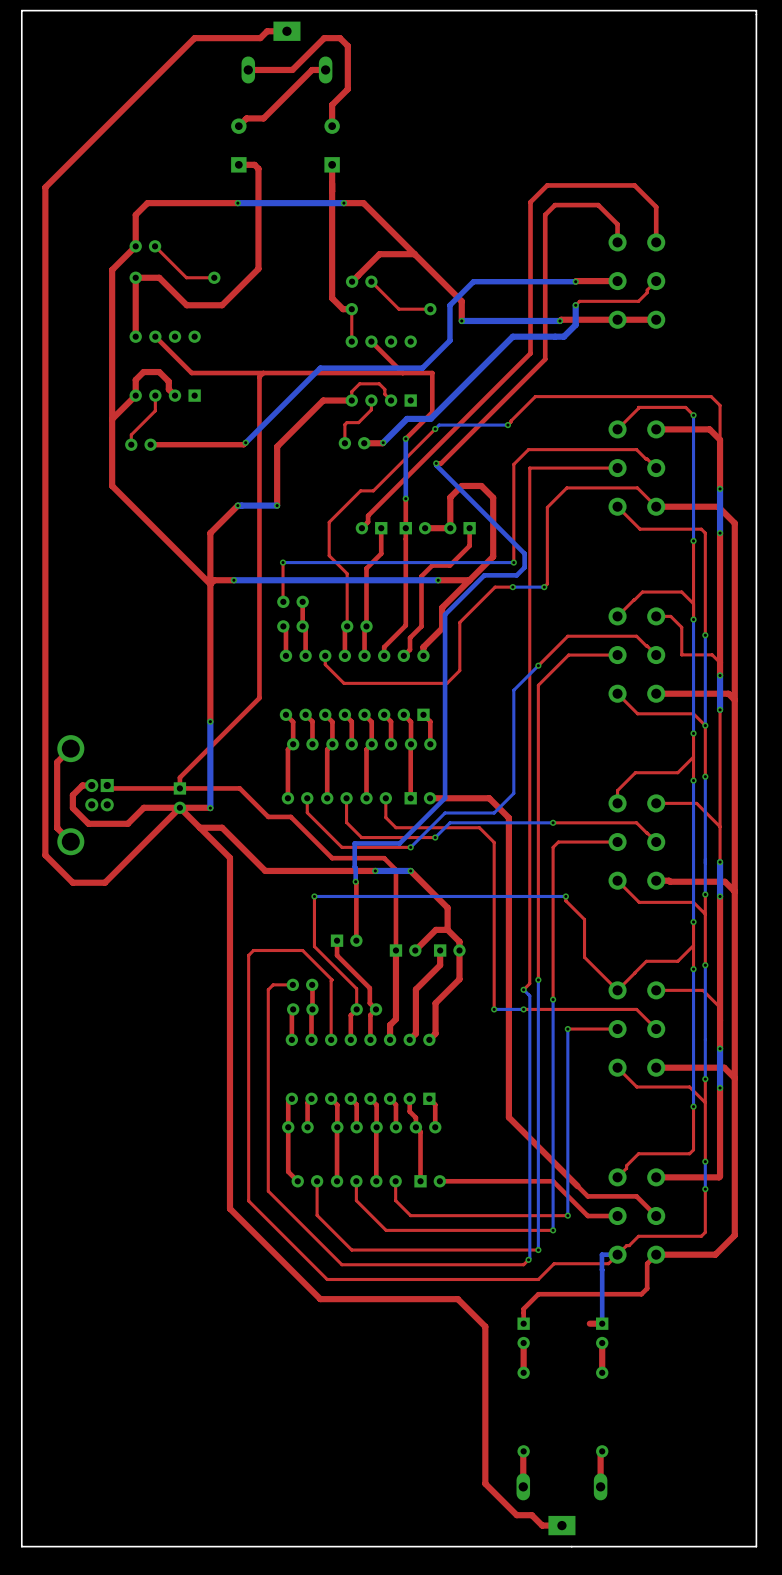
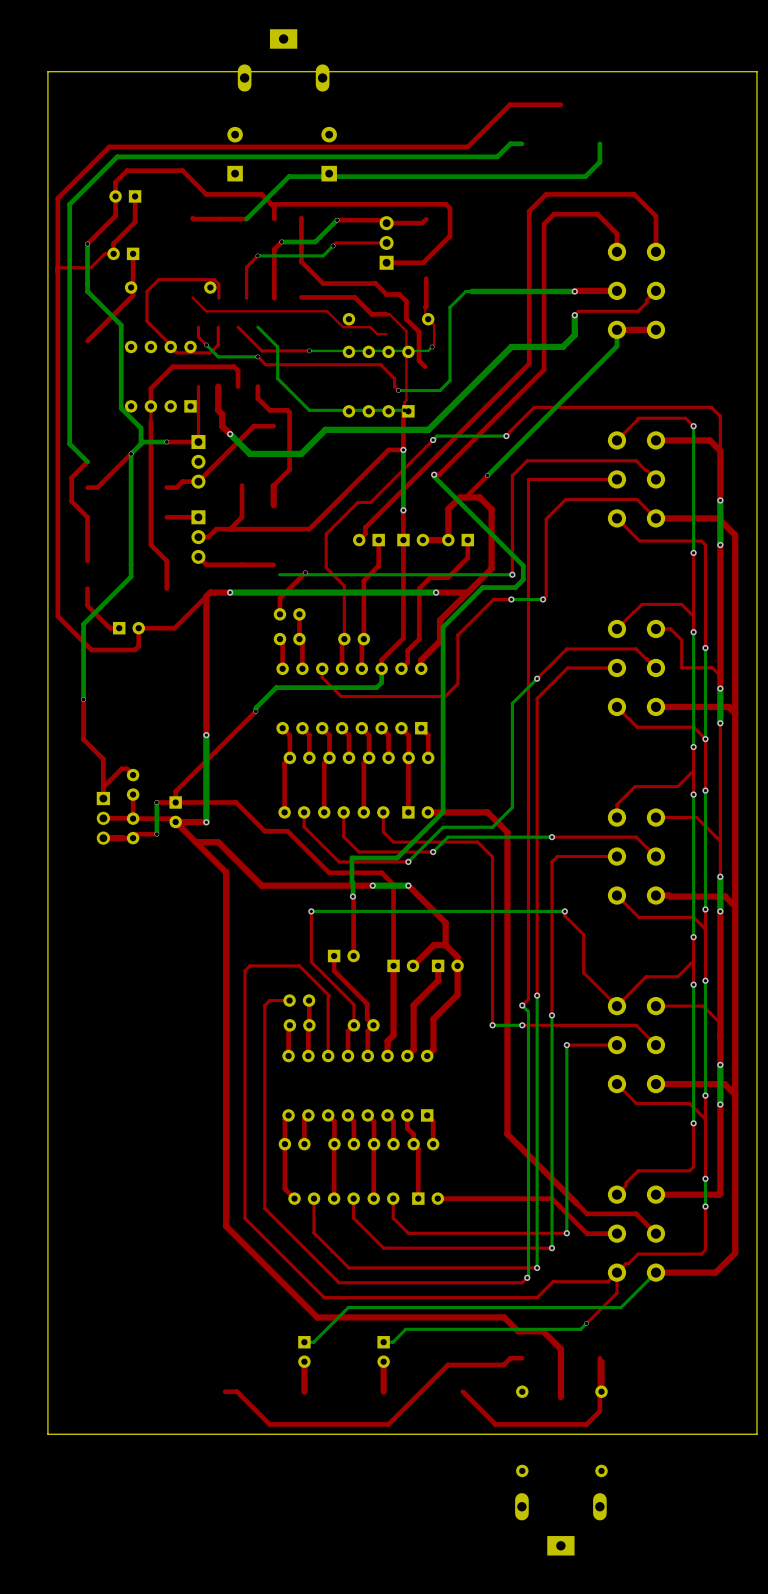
top track: (286, 31) (267, 31) (260, 38) (194, 38) (45, 187) (45, 855) (72, 882) (104, 882) (179, 807) (143, 807) (127, 823) -> (156, 834) (137, 834) (133, 838) (123, 838)
board edge: (756, 63) (756, 10) (21, 10) (21, 1546) (756, 1546) (756, 1415) -> (756, 71) (47, 71) (47, 1434) (756, 1434)
top track: (248, 69) (292, 69) (324, 38) (339, 38) (347, 45) (347, 89) (332, 104) (332, 126) -> none
top track: (325, 69) (312, 69) (263, 118) (246, 118) (238, 126) -> none
top track: none -> (560, 104) (509, 104) (467, 146) (109, 146) (57, 198) (57, 616) (91, 649) (135, 649) (138, 646) (138, 628) (174, 628) (206, 596)
bottom track: none -> (521, 143) (510, 143) (497, 156) (117, 156) (69, 204) (69, 444) (87, 461)
bottom track: none -> (599, 143) (599, 162) (585, 176) (289, 176) (246, 219)
top track: (238, 164) (254, 164) (258, 168) (258, 268) (222, 305) (186, 305) (159, 277) (135, 277) (135, 336) -> none
top track: (332, 164) (332, 298) (343, 309) (351, 309) (351, 341) -> none
part: none -> (125, 196)
top track: none -> (135, 196) (135, 222) (113, 243) (113, 253) (104, 253) (90, 267) (57, 267)
top track: none -> (271, 204) (446, 204) (449, 208) (449, 236) (423, 262) (386, 262)
top track: (237, 203) (147, 203) (135, 214) (135, 246) (112, 269) (112, 485) (210, 584) (210, 533) (237, 505) -> none
via: (237, 203) -> none
top track: (343, 203) (363, 203) (461, 301) (461, 320) -> none
bottom track: (343, 203) (237, 203) -> none
via: (343, 203) -> none
top track: none -> (192, 218) (246, 219)
top track: none -> (274, 219) (274, 206) (261, 194) (206, 194) (182, 170) (127, 170) (115, 182) (115, 215) (87, 243)
top track: none -> (301, 218) (301, 261) (323, 283) (375, 283) (386, 294) (399, 294) (406, 301) (406, 319) (418, 331) (418, 360) (425, 366)
bottom track: none -> (337, 220) (315, 241) (281, 241)
via: none -> (337, 220)
top track: none -> (426, 219) (422, 223) (386, 223) (383, 220) (337, 220)
top track: none -> (281, 241) (274, 249) (274, 298)
via: none -> (281, 241)
top track: none -> (386, 242) (336, 242) (333, 245)
part: none -> (386, 242)
bottom track: none -> (87, 243) (87, 291) (121, 325) (121, 408) (141, 428) (141, 444)
via: none -> (87, 243)
bottom track: none -> (333, 245) (323, 255) (257, 255)
via: none -> (333, 245)
part: none -> (123, 253)
top track: none -> (133, 253) (133, 295) (87, 341)
part: (145, 246) -> none
top track: (155, 246) (186, 277) (214, 277) -> none
top track: none -> (257, 255) (246, 267) (246, 298)
via: none -> (257, 255)
top track: (414, 254) (379, 254) (352, 281) -> none
top track: none -> (426, 278) (425, 315) (434, 324) (434, 344) (432, 346)
part: (361, 281) -> none
top track: (371, 281) (398, 309) (430, 309) -> none
bottom track: (473, 281) (449, 305) (449, 340) (422, 368) (320, 368) (245, 442) -> none
bottom track: none -> (473, 291) (465, 291) (449, 307) (449, 380) (440, 390) (398, 390)
top track: none -> (192, 297) (206, 311) (327, 311) (343, 327) (370, 327) (377, 334) (386, 334)
top track: none -> (301, 297) (354, 297) (371, 314) (389, 314) (406, 331) (406, 400) (403, 411) (403, 449) (388, 449) (309, 529)
top track: none -> (218, 298) (218, 284) (214, 279) (158, 279) (146, 291) (146, 321) (176, 352) (210, 352) (218, 344) (218, 327)
top track: none -> (198, 327) (198, 337) (206, 344)
top track: none -> (238, 327) (261, 350) (309, 350)
bottom track: none -> (257, 327) (277, 346) (277, 378) (309, 410) (404, 410)
top track: (617, 319) (559, 320) -> none
bottom track: none -> (616, 329) (616, 346) (487, 475)
via: (461, 320) -> none
bottom track: (559, 320) (461, 320) -> none
via: (559, 320) -> none
bottom track: none -> (206, 344) (218, 356) (257, 356)
via: none -> (206, 344)
top track: (155, 336) (191, 373) (432, 373) (432, 412) (405, 438) -> none
bottom track: none -> (432, 346) (428, 350) (309, 350)
via: none -> (432, 346)
via: none -> (309, 350)
top track: (371, 341) (402, 373) -> none
top track: none -> (257, 356) (265, 364) (380, 364) (394, 378) (394, 386) (398, 390)
via: none -> (257, 356)
top track: (263, 373) (259, 376) (259, 698) -> none
top track: none -> (198, 386) (198, 442) (166, 442)
top track: none -> (218, 386) (218, 410) (222, 414) (222, 426) (230, 434)
top track: none -> (238, 386) (238, 370) (234, 366) (172, 366) (150, 388) (150, 406)
via: none -> (398, 390)
top track: (175, 395) (168, 389) (168, 381) (159, 372) (143, 372) (135, 379) (135, 395) (112, 419) -> none
via: none -> (404, 410)
top track: (371, 400) (371, 409) (358, 422) (346, 422) (344, 424) (344, 443) -> none
top track: (391, 400) (379, 383) (359, 383) (351, 391) (351, 400) (323, 400) (277, 446) (277, 474) -> (257, 386) (257, 398) (269, 410) (287, 410) (289, 412) (289, 469) (273, 485)
top track: (155, 410) (131, 434) (131, 444) -> (150, 421) (150, 545) (166, 560) (166, 588)
top track: none -> (273, 426) (253, 426) (198, 481) (182, 481) (176, 487) (166, 487)
bottom track: (407, 418) (383, 442) -> (404, 429) (325, 429) (301, 453) (249, 453) (230, 434)
bottom track: none -> (166, 442) (142, 442) (131, 453) (131, 576) (83, 624) (83, 699)
via: none -> (166, 442)
top track: none -> (131, 453) (97, 487) (87, 487)
via: none -> (131, 453)
top track: (245, 442) (243, 444) (150, 444) -> none
via position: (245, 442) -> (230, 434)
top track: (383, 442) (364, 443) -> none
via: (383, 442) -> none
part: (354, 443) -> none
part: (140, 444) -> none
top track: none -> (87, 461) (71, 477) (71, 501) (87, 517) (87, 560)
part: none -> (198, 461)
top track: none -> (487, 475) (465, 497) (459, 497)
via: none -> (487, 475)
top track: none -> (242, 485) (242, 517) (230, 529) (309, 529)
top track: (277, 493) (277, 505) -> none
top track: none -> (198, 517) (166, 517)
via: (237, 505) -> none
bottom track: (277, 505) (237, 505) -> none
via: (277, 505) -> none
top track: none -> (309, 529) (216, 529) (208, 537) (198, 537)
part: none -> (198, 537)
top track: none -> (198, 556) (206, 564) (273, 564)
top track: none -> (305, 572) (279, 598) (279, 614)
via: none -> (305, 572)
top track: (283, 562) (283, 601) -> none
via: (283, 562) -> none
top track: none -> (87, 588) (87, 605) (109, 628) (119, 628)
part: none -> (128, 628)
bottom track: none -> (381, 668) (381, 682) (376, 687) (276, 687) (255, 708) (255, 711)
top track: none -> (83, 699) (83, 739) (103, 759) (103, 798)
via: none -> (83, 699)
via: none -> (255, 711)
top track: (70, 748) (57, 762) (57, 827) (70, 841) -> none
top track: none -> (133, 775) (126, 768) (121, 768) (103, 787)
part: none -> (133, 784)
top track: none -> (133, 794) (133, 818)
top track: (91, 785) (82, 785) (72, 795) (72, 808) (88, 823) (108, 823) -> none
top track: (107, 785) (110, 788) (161, 788) -> none
bottom track: none -> (156, 802) (156, 834)
via: none -> (156, 802)
part: (85, 795) -> none
top track: none -> (103, 818) (133, 818)
part: none -> (103, 818)
top track: none -> (133, 818) (172, 818) (175, 821)
part: none -> (133, 828)
via: none -> (156, 834)
top track: none -> (616, 1272) (616, 1293) (586, 1323)
bottom track: (617, 1254) (601, 1254) (602, 1323) -> none
top track: (656, 1254) (647, 1263) (647, 1288) (641, 1294) (538, 1294) (523, 1308) (523, 1323) -> none
bottom track: none -> (655, 1272) (621, 1307) (348, 1307) (313, 1342) (304, 1342)
top track: (457, 1299) (485, 1326) (485, 1483) (516, 1515) (531, 1515) (542, 1525) (561, 1525) -> (455, 1317) (504, 1317) (518, 1331) (543, 1331) (560, 1349) (560, 1397)
bottom track: none -> (586, 1323) (580, 1329) (405, 1329) (393, 1342) (383, 1342)
via: none -> (586, 1323)
top track: (602, 1323) (589, 1323) -> none
part: none -> (304, 1351)
part: none -> (383, 1351)
part: (523, 1333) -> none
part: (602, 1333) -> none
top track: none -> (521, 1358) (510, 1358) (503, 1364) (448, 1364) (388, 1424) (269, 1424) (237, 1391) (225, 1391)
top track: none -> (599, 1358) (599, 1411) (586, 1424) (495, 1424) (462, 1391)
top track: none -> (304, 1361) (304, 1391)
top track: (523, 1343) (523, 1372) -> (383, 1361) (383, 1391)
top track: (523, 1451) (523, 1486) -> none
top track: (602, 1451) (600, 1452) (600, 1486) -> none

